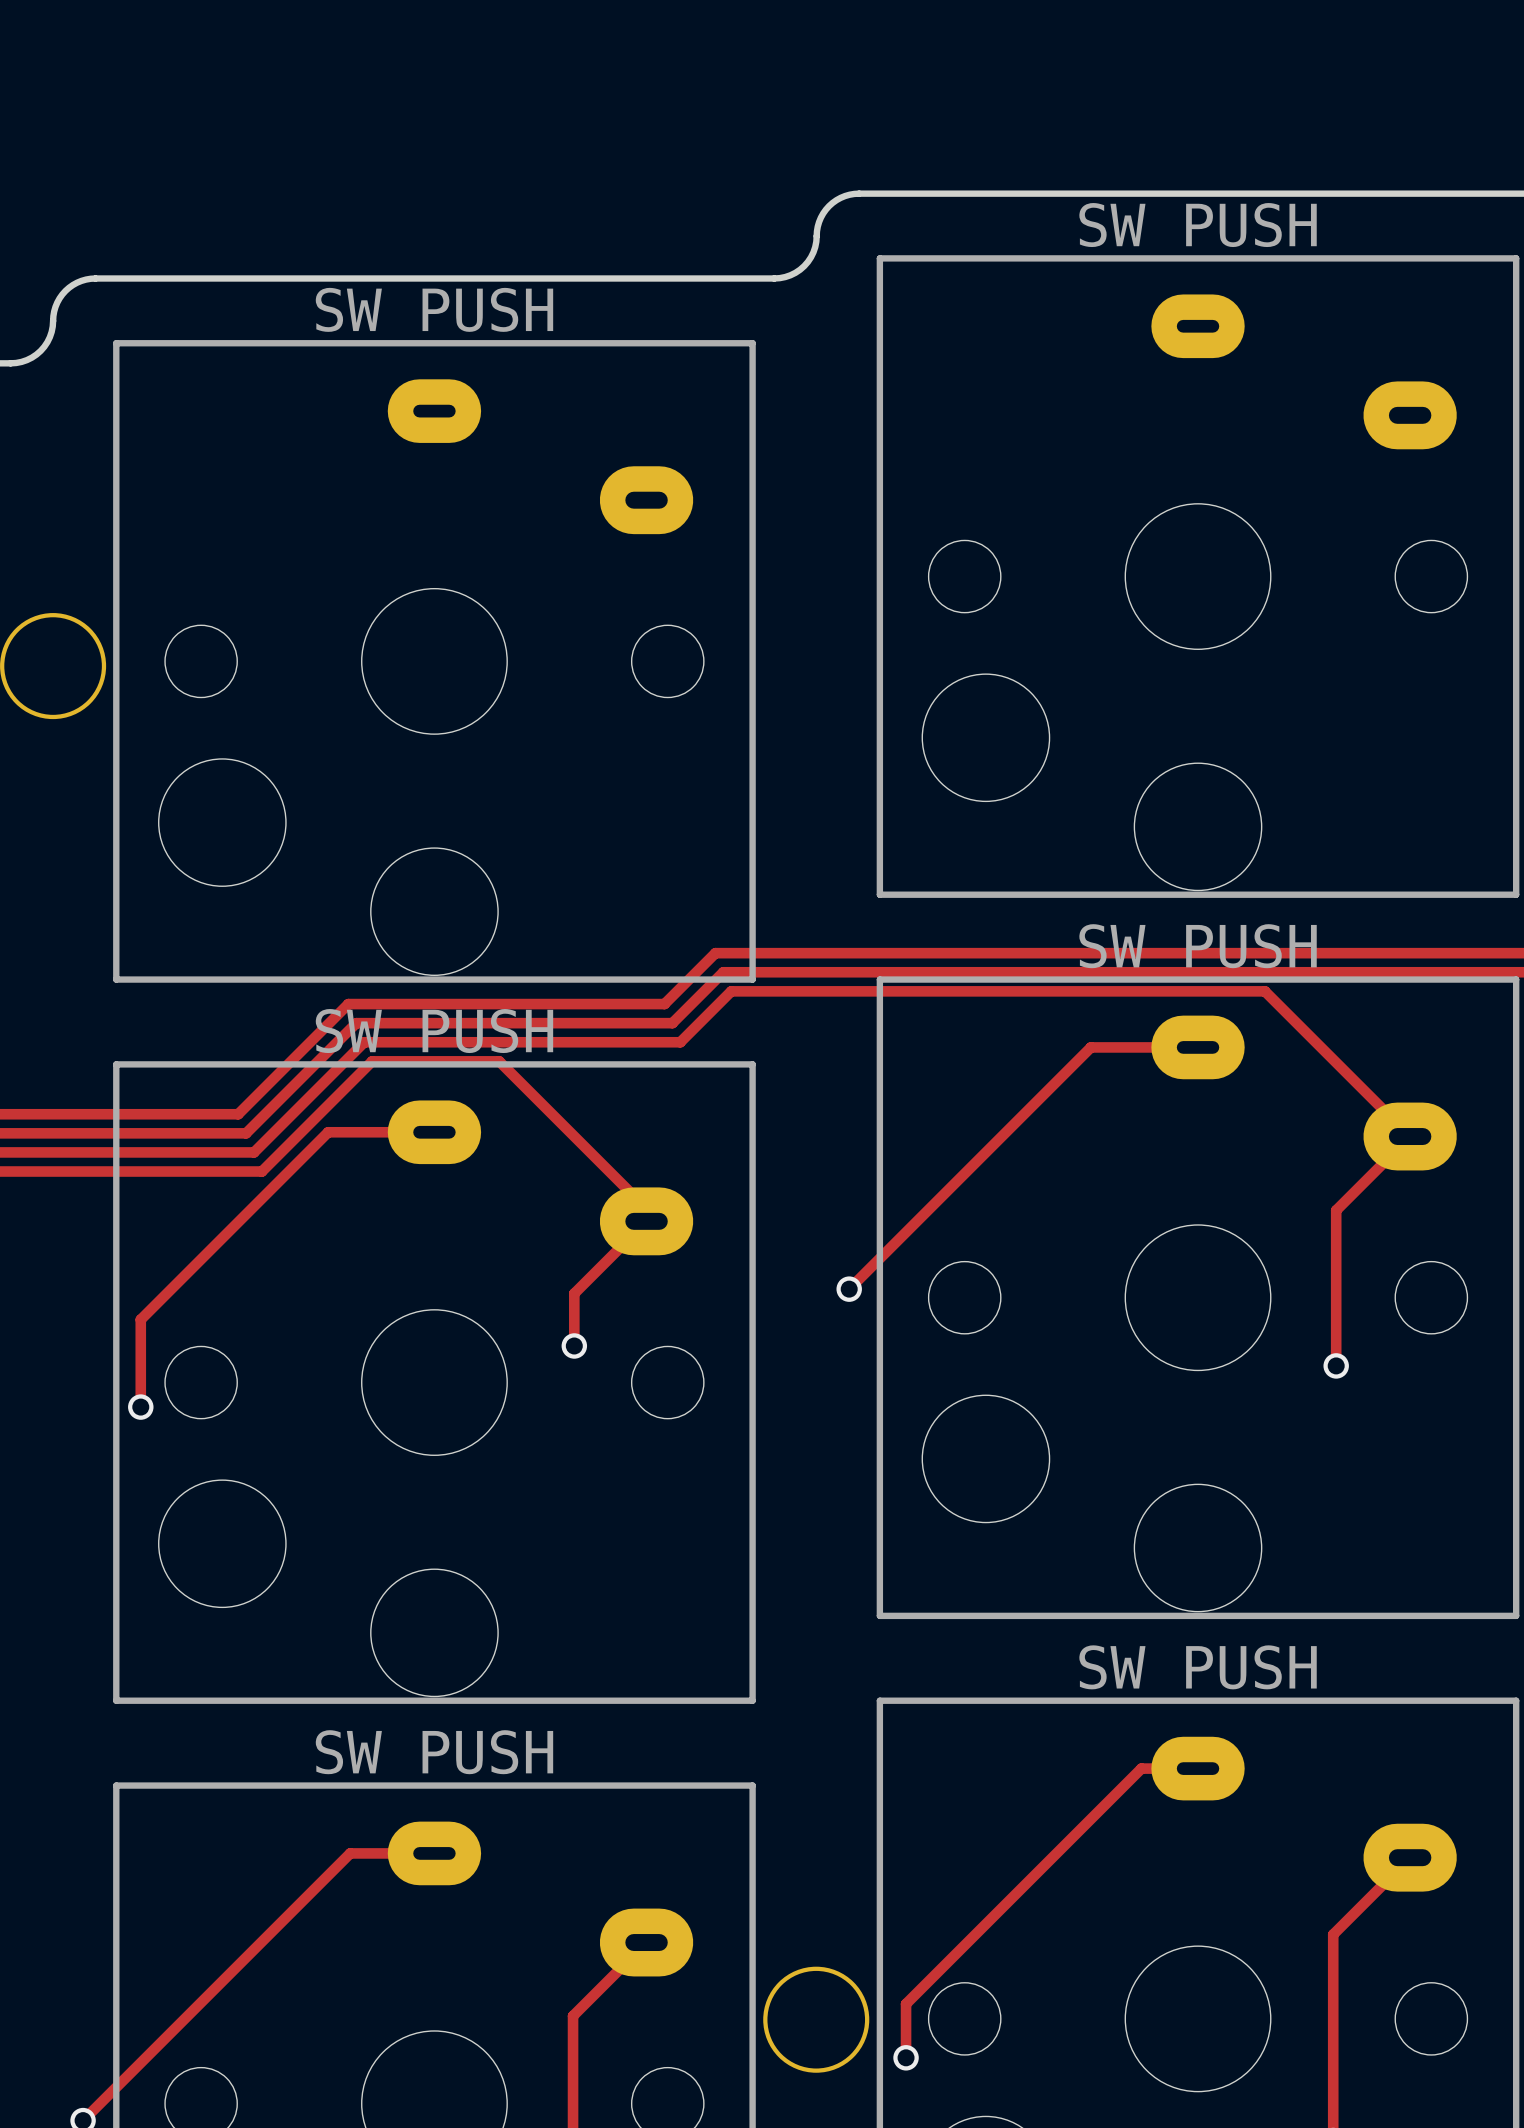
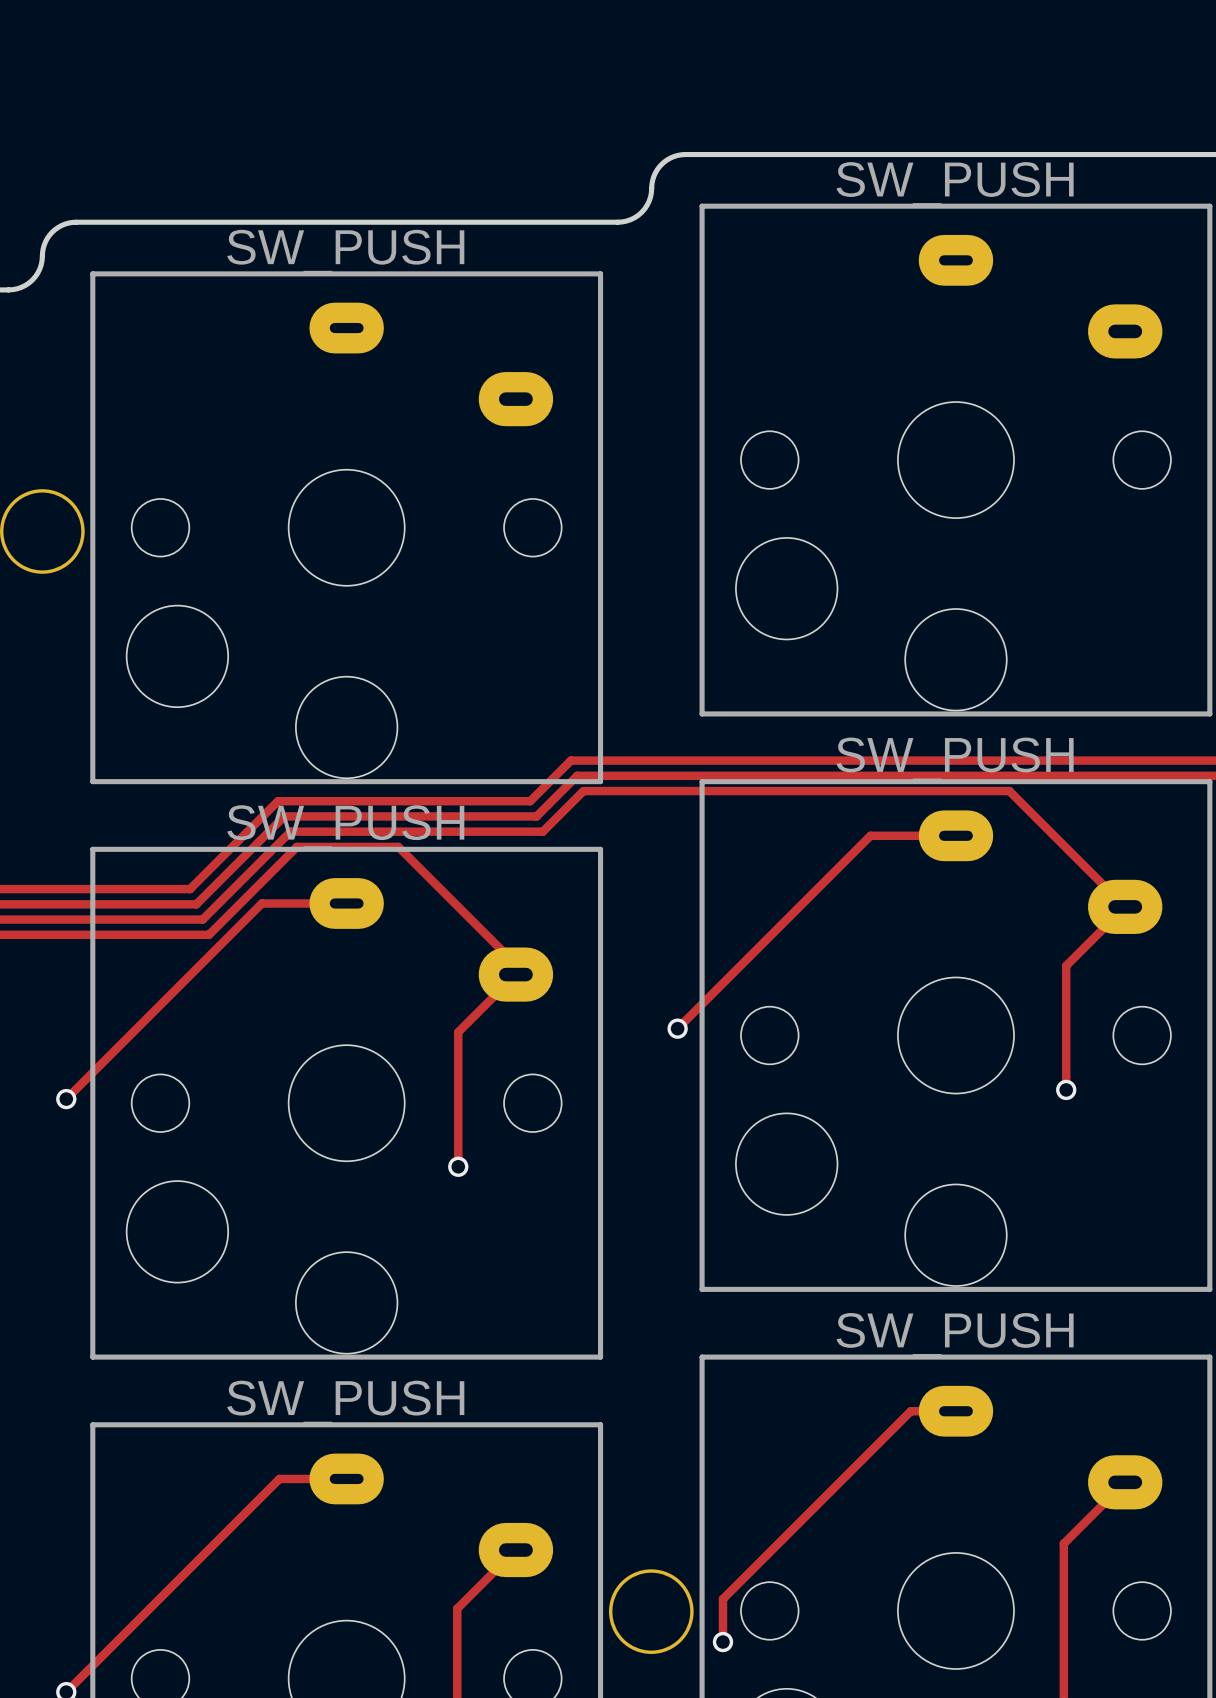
track: (140, 1319) (140, 1407) -> (112, 1053) (66, 1099)
track: none -> (458, 1074) (458, 1166)
via position: (574, 1345) -> (458, 1166)
via position: (140, 1407) -> (66, 1099)

